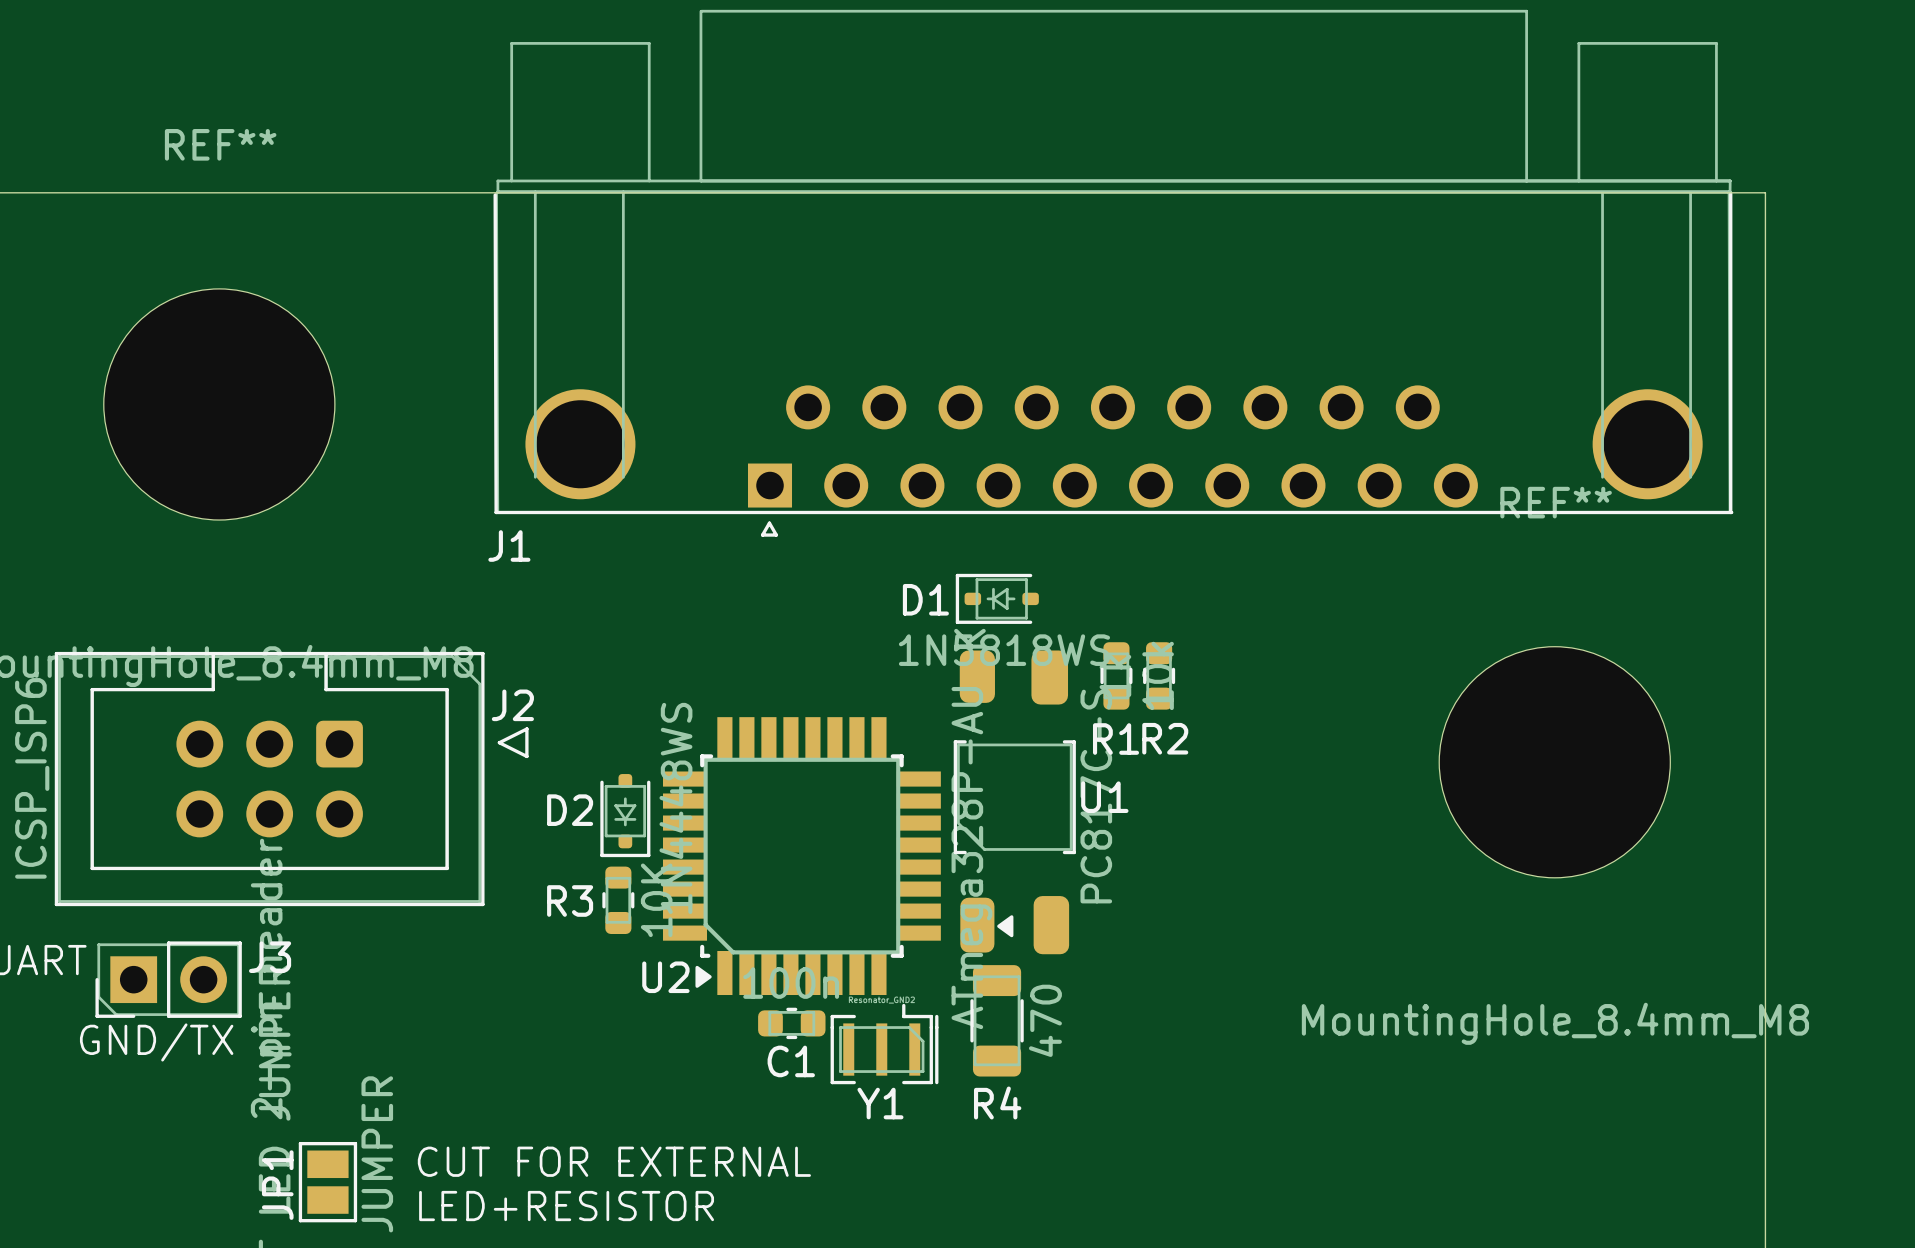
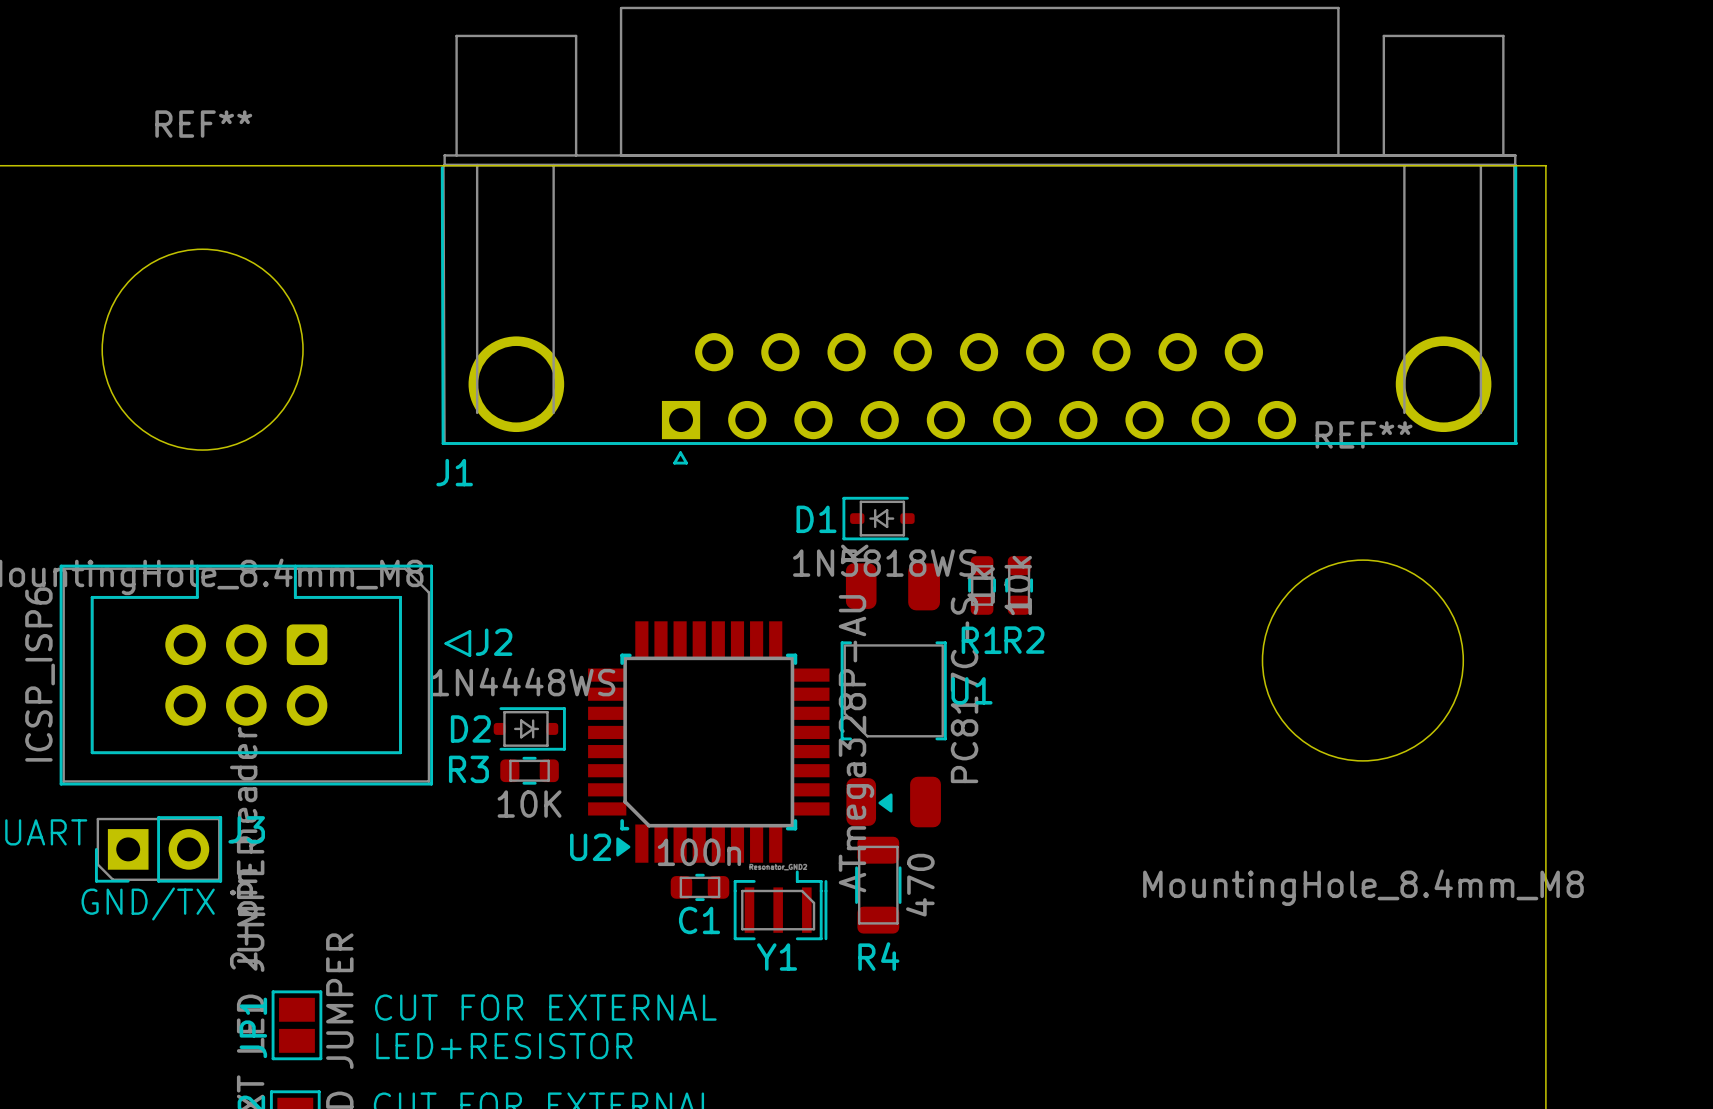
J2 name position: J2 (512, 705) -> J2 (494, 642)
D2 rotation: 0° (625, 815) -> 90° counterclockwise (529, 728)
R3 rotation: 0° (618, 900) -> 90° clockwise (529, 770)

